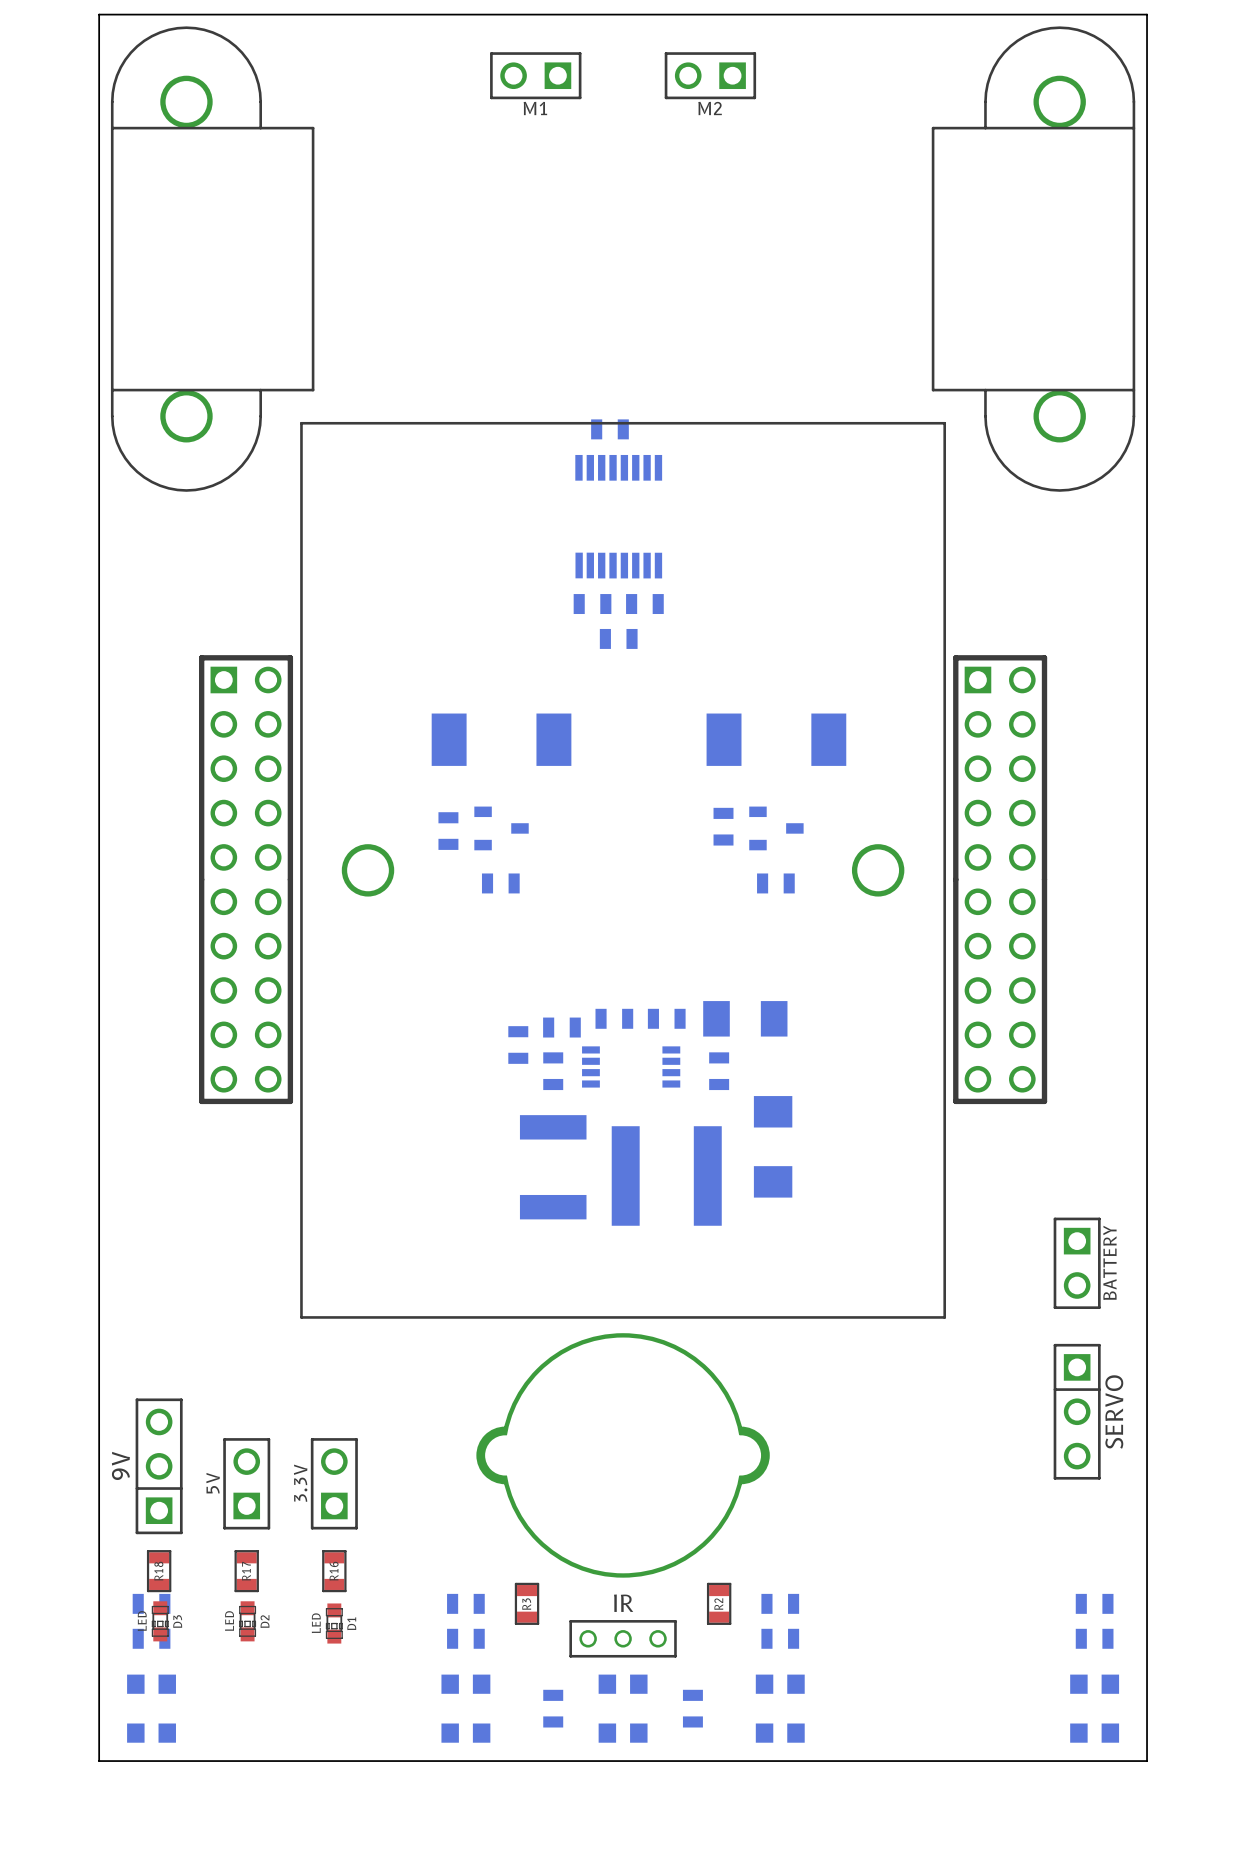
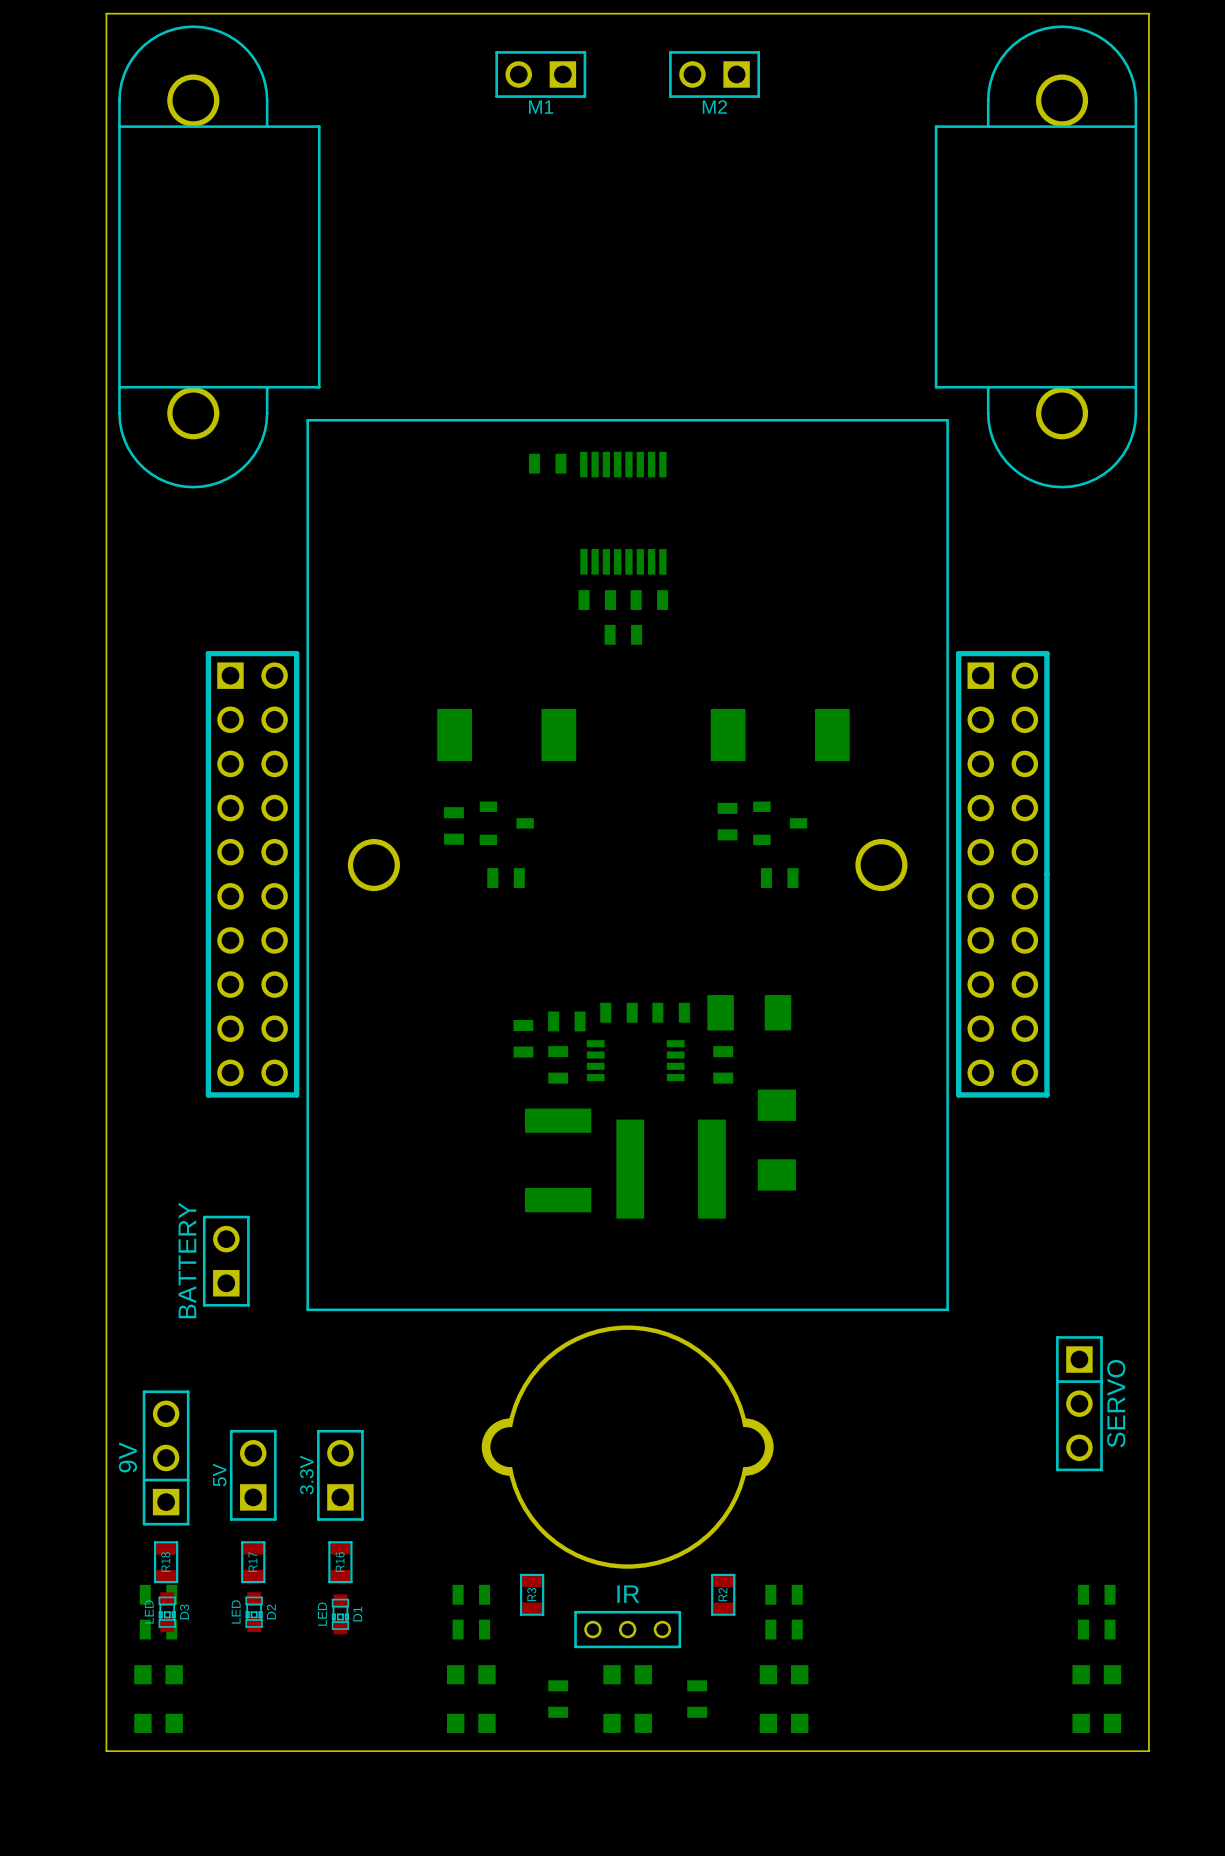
part position: (609, 429) -> (547, 463)
part: BATTERY (1077, 1263) -> none
part: none -> BATTERY (226, 1261)

